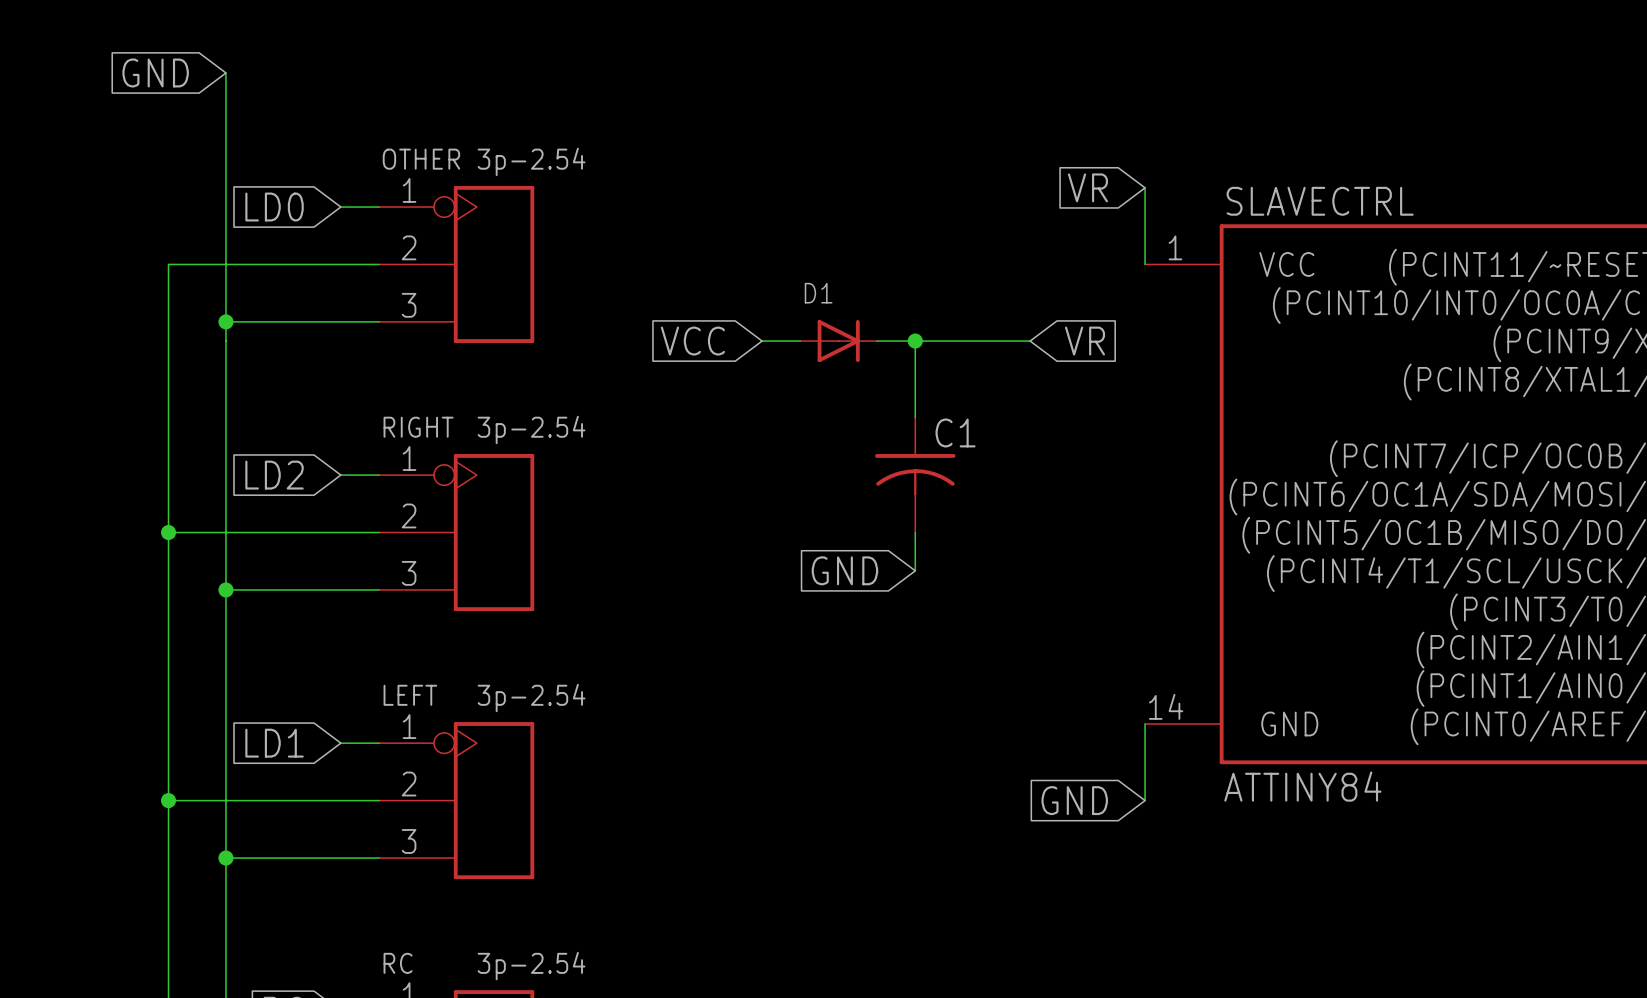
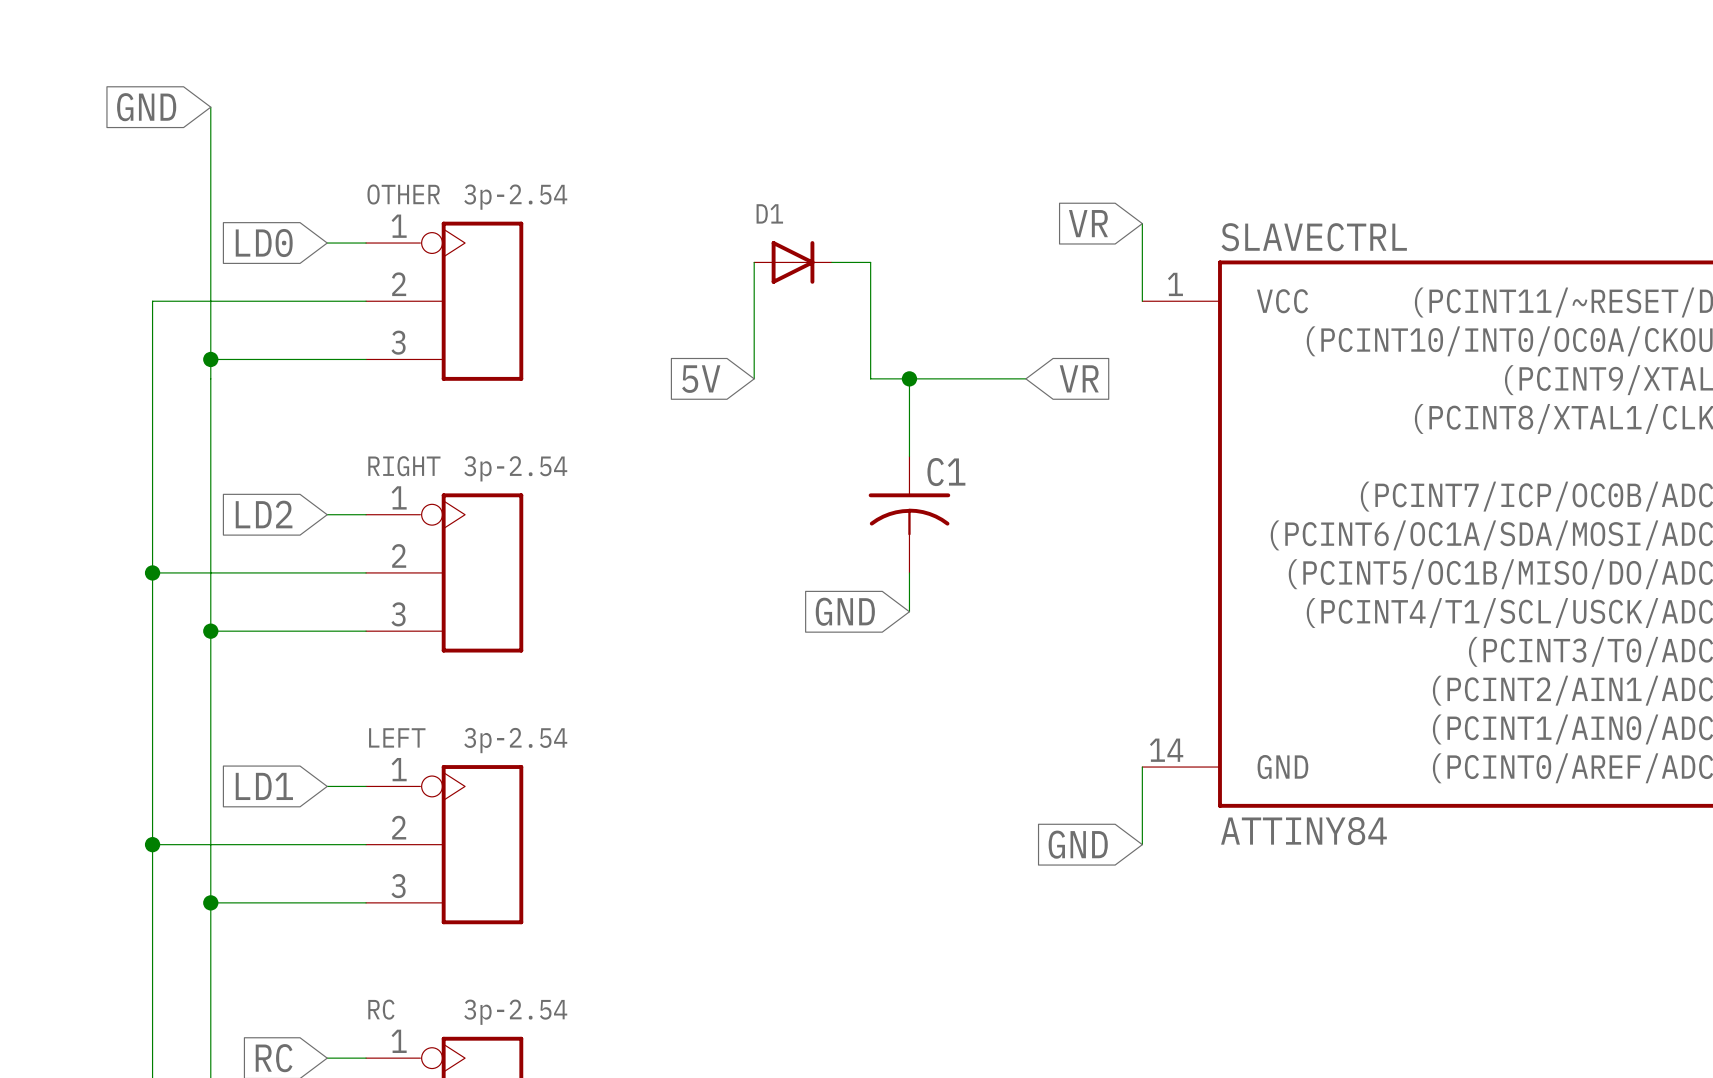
wire: none -> (831, 262) (870, 262) (870, 378)
global label: VCC (692, 341) -> 5V (701, 379)
wire: (762, 341) (800, 341) -> (754, 378) (754, 262)
D1 position: (838, 341) -> (793, 262)

